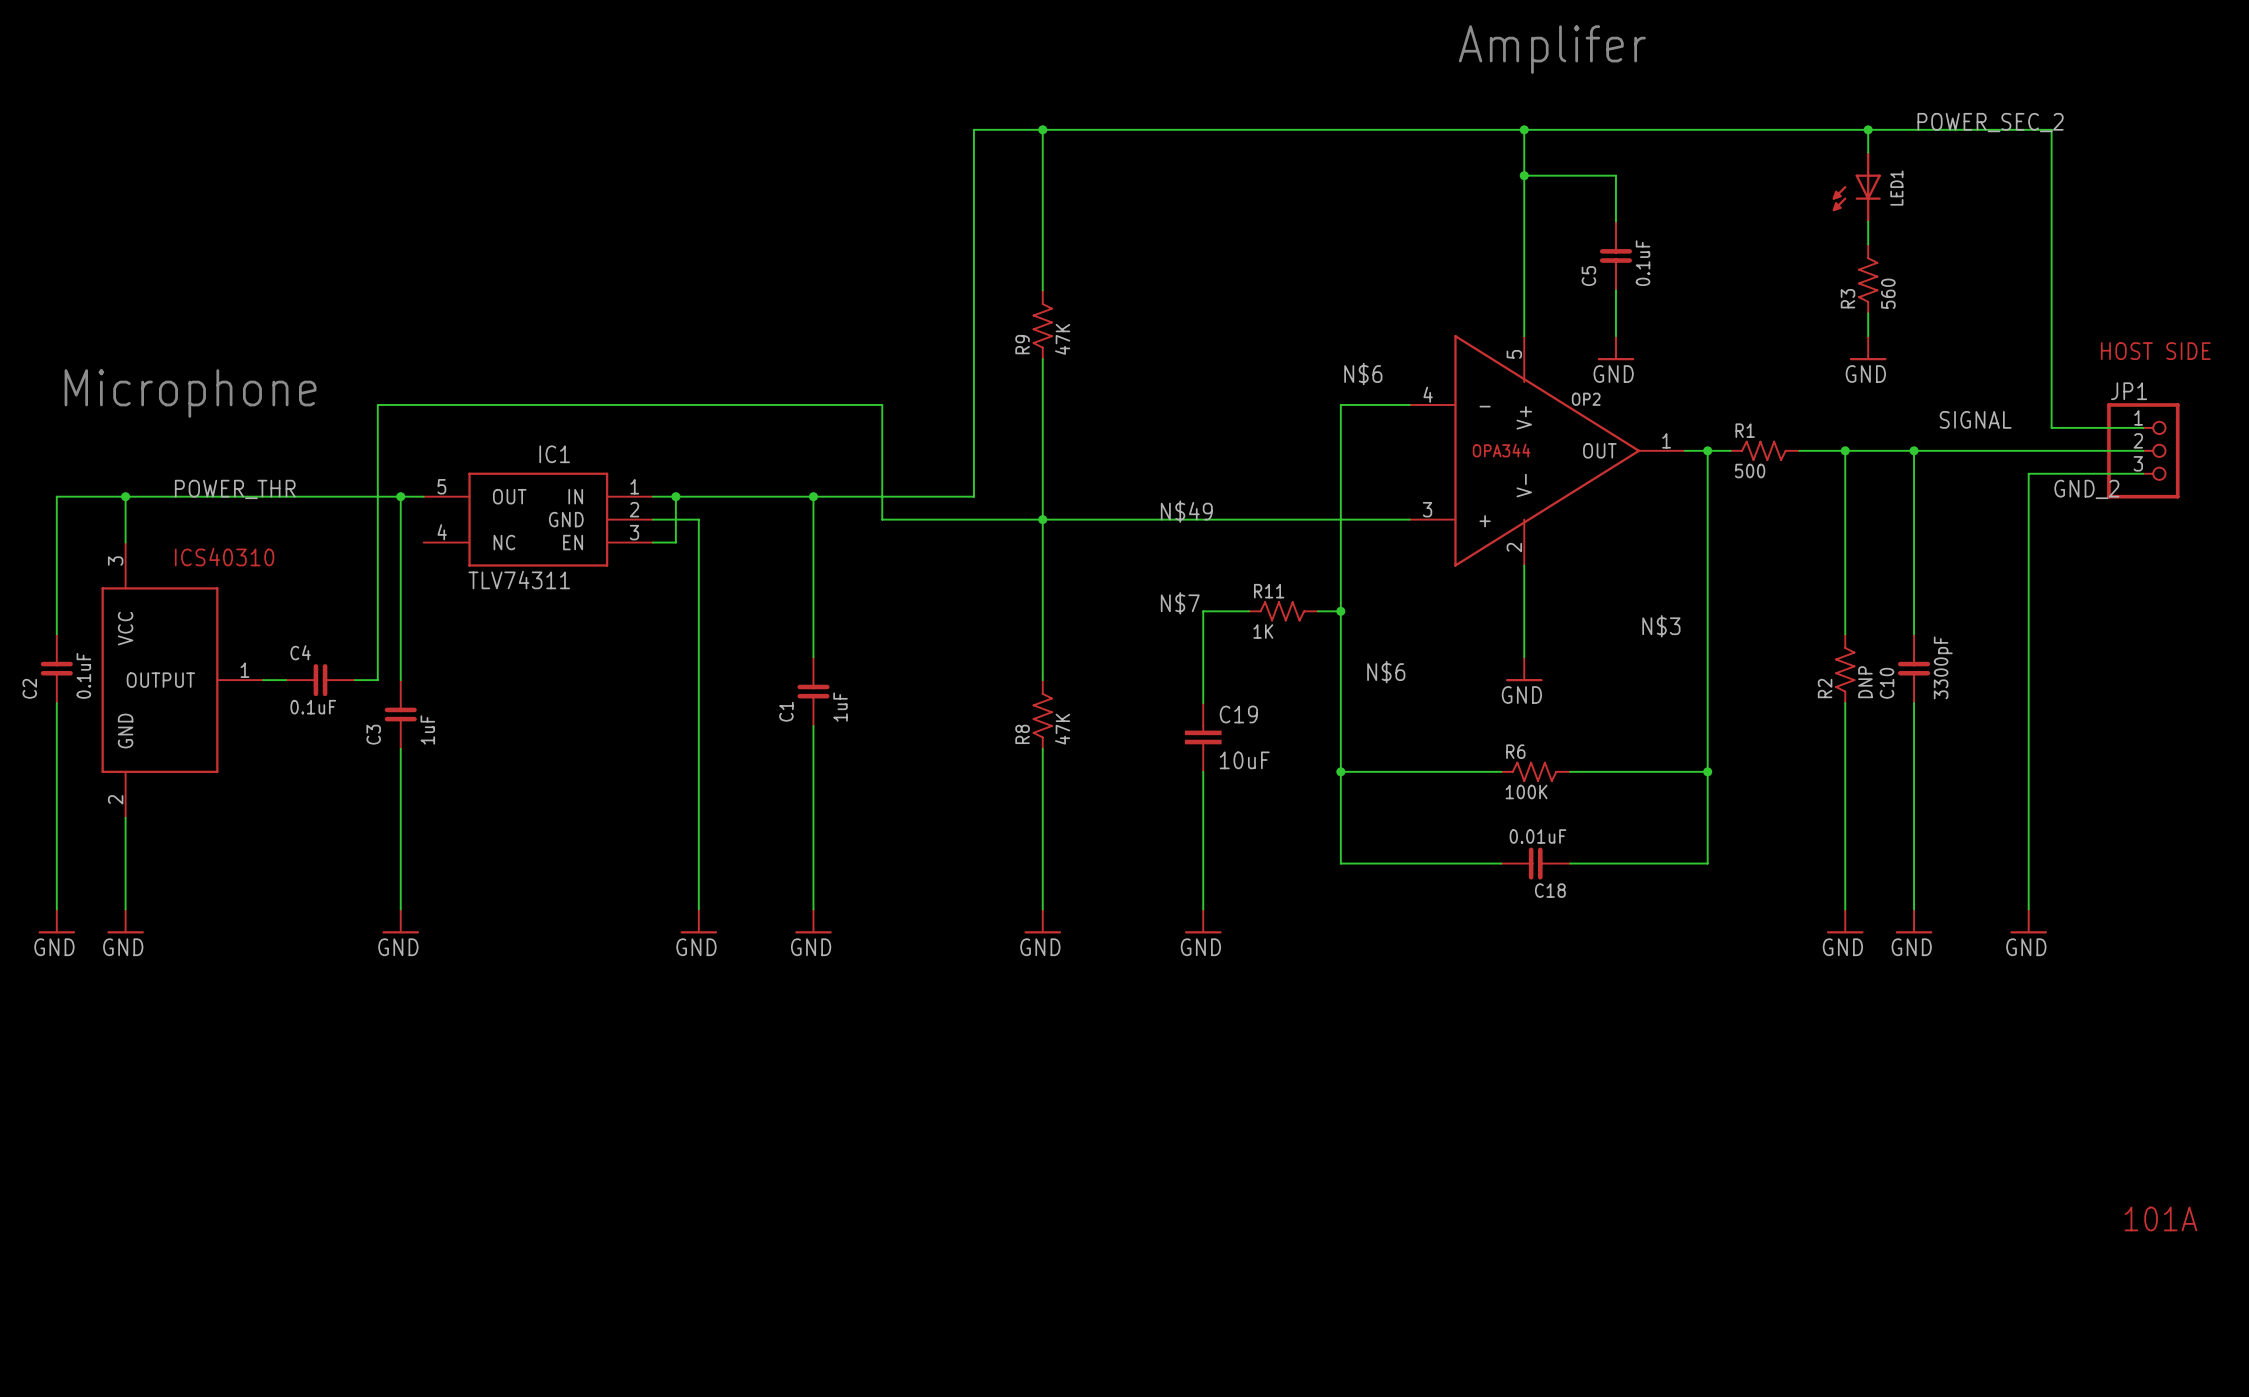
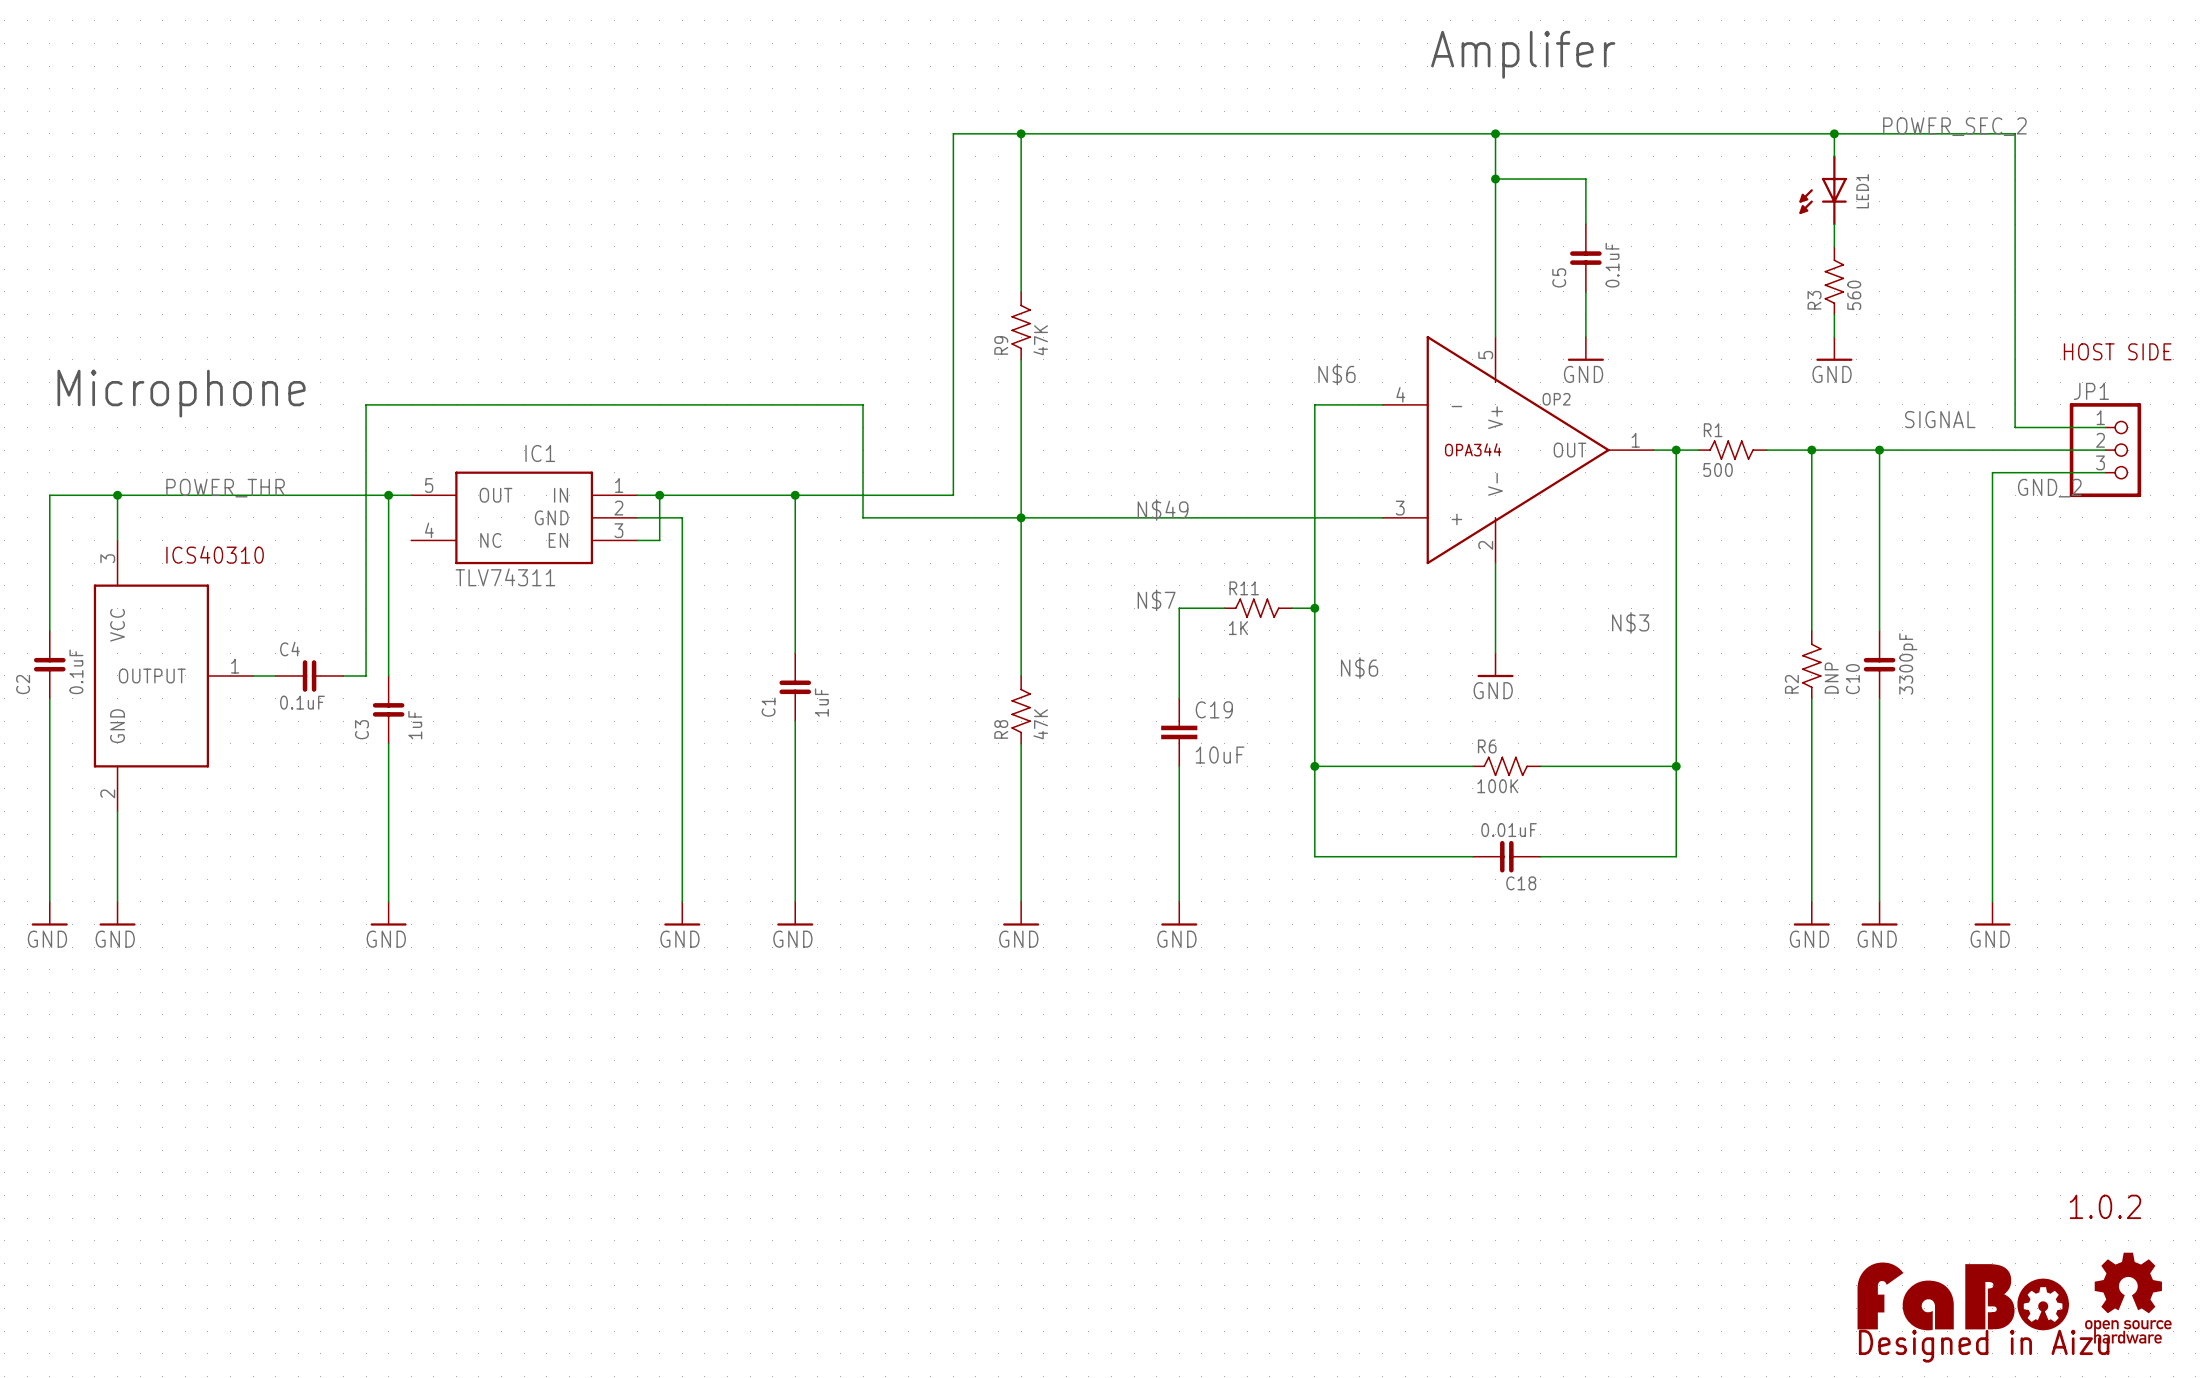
text: none -> 1.0.2 (2105, 1206)
text: 101A (2160, 1218) -> none
part: none -> (1963, 1296)
part: none -> (2128, 1298)

